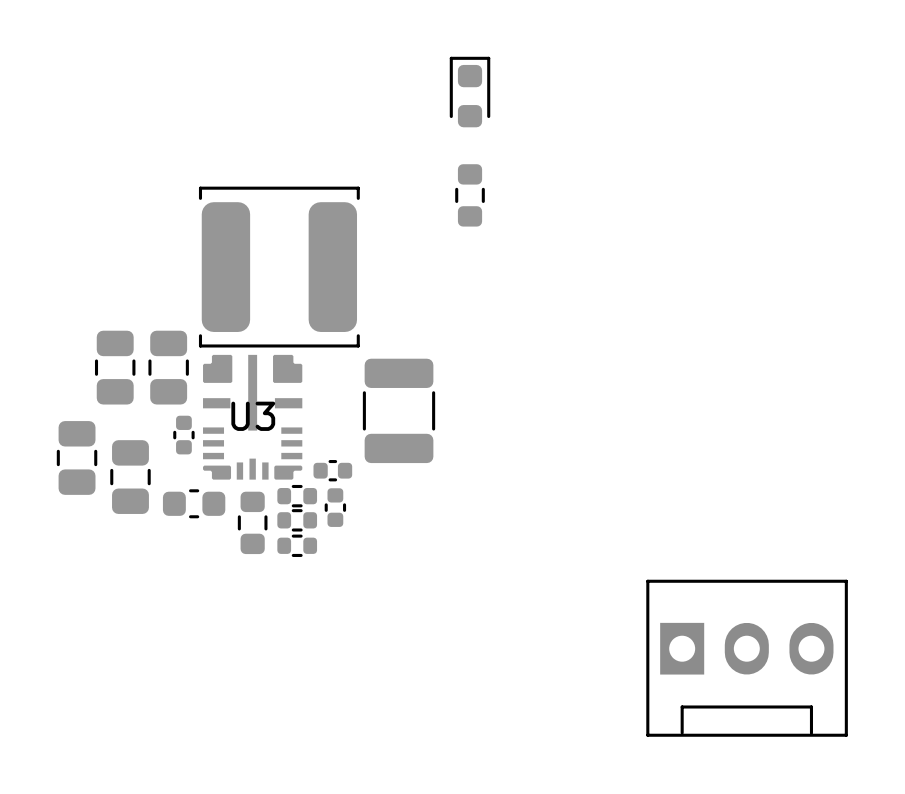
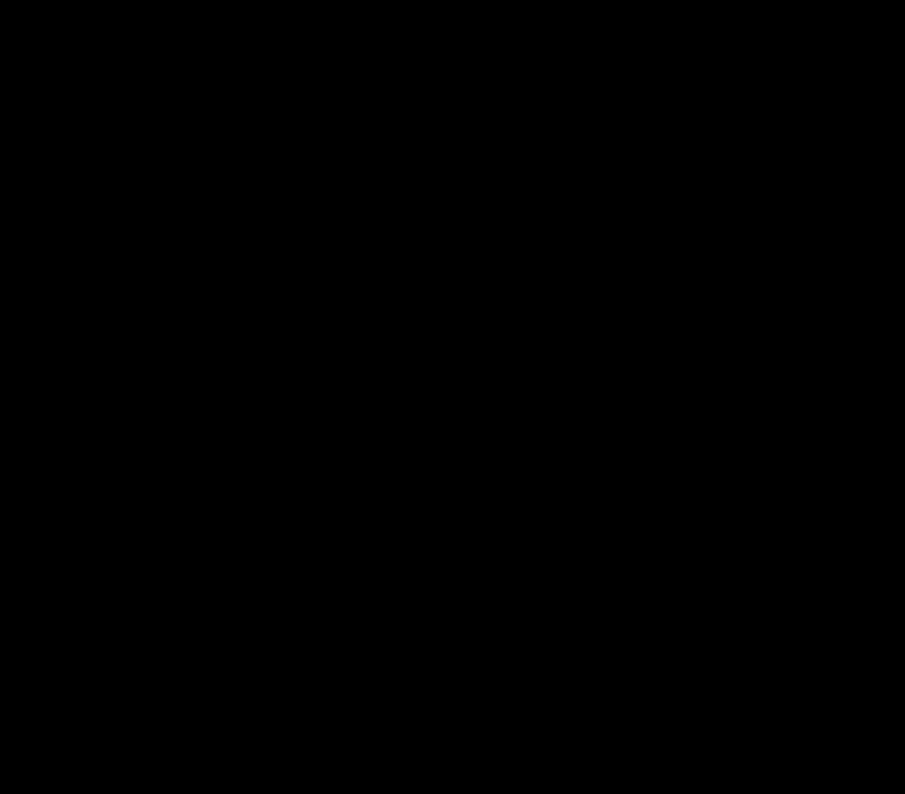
part: (470, 92) -> none
part: (470, 195) -> none
part: (279, 267) -> none
part: (115, 367) -> none
part: (168, 367) -> none
part: (399, 410) -> none
U3: (252, 417) -> none
part: (183, 435) -> none
part: (77, 457) -> none
part: (332, 470) -> none
part: (130, 477) -> none
part: (297, 496) -> none
part: (194, 503) -> none
part: (335, 507) -> none
part: (297, 520) -> none
part: (252, 522) -> none
part: (297, 545) -> none
part: (747, 658) -> none

